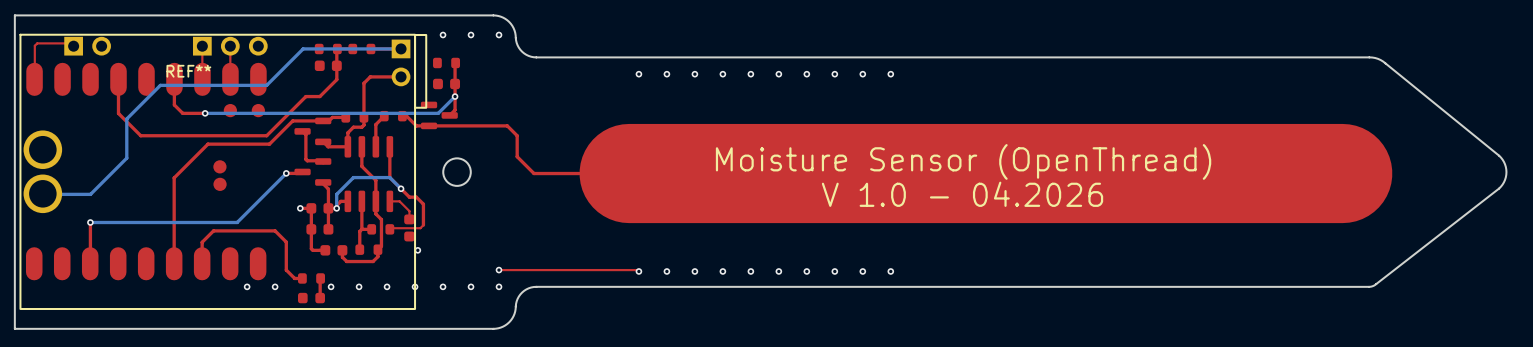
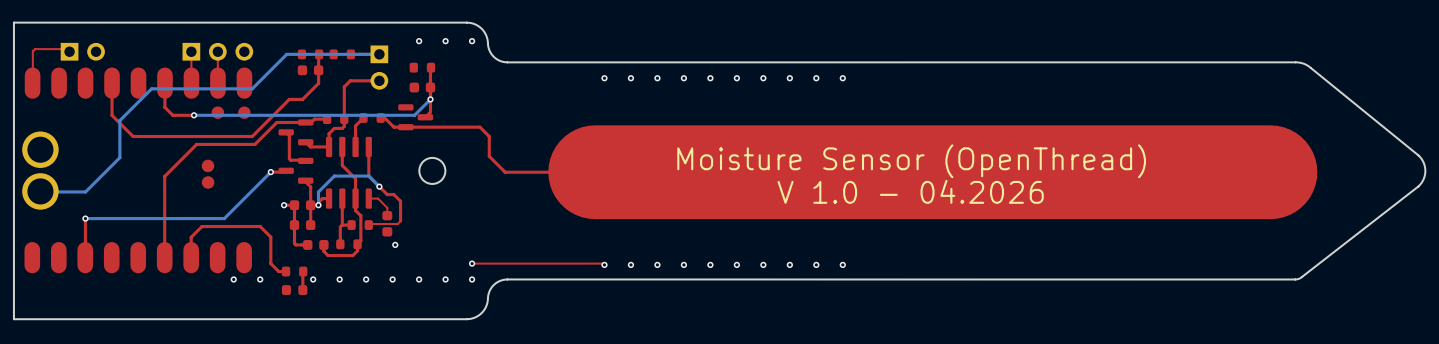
REF**: (223, 171) -> none

